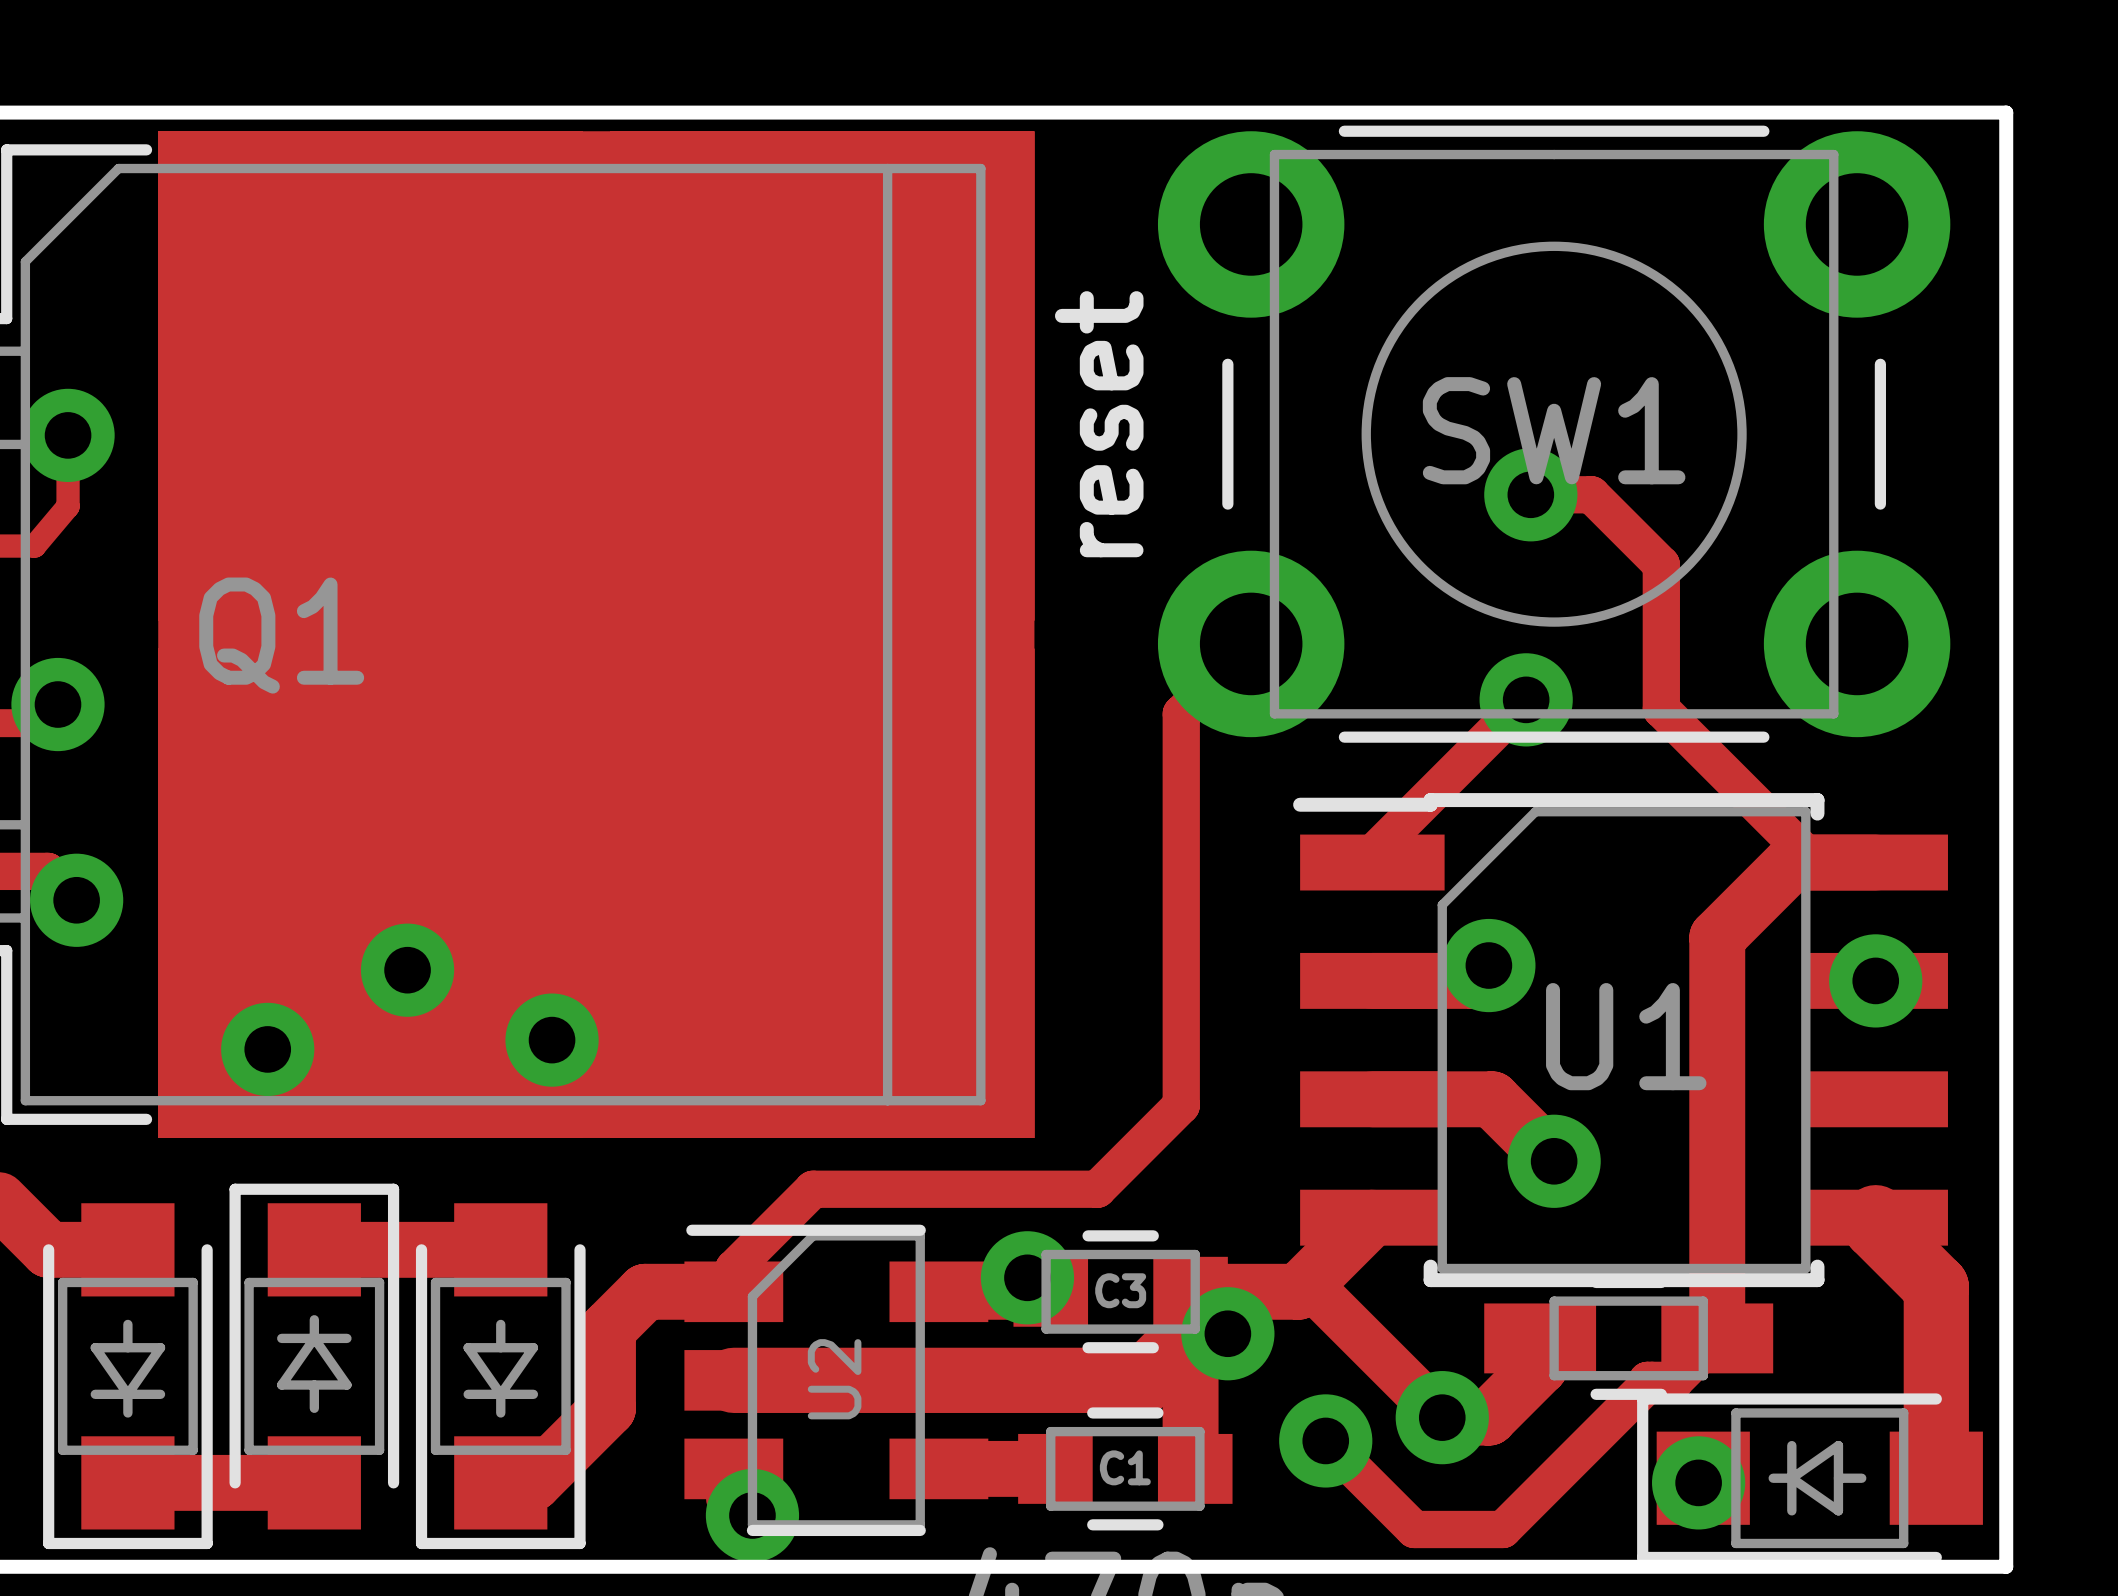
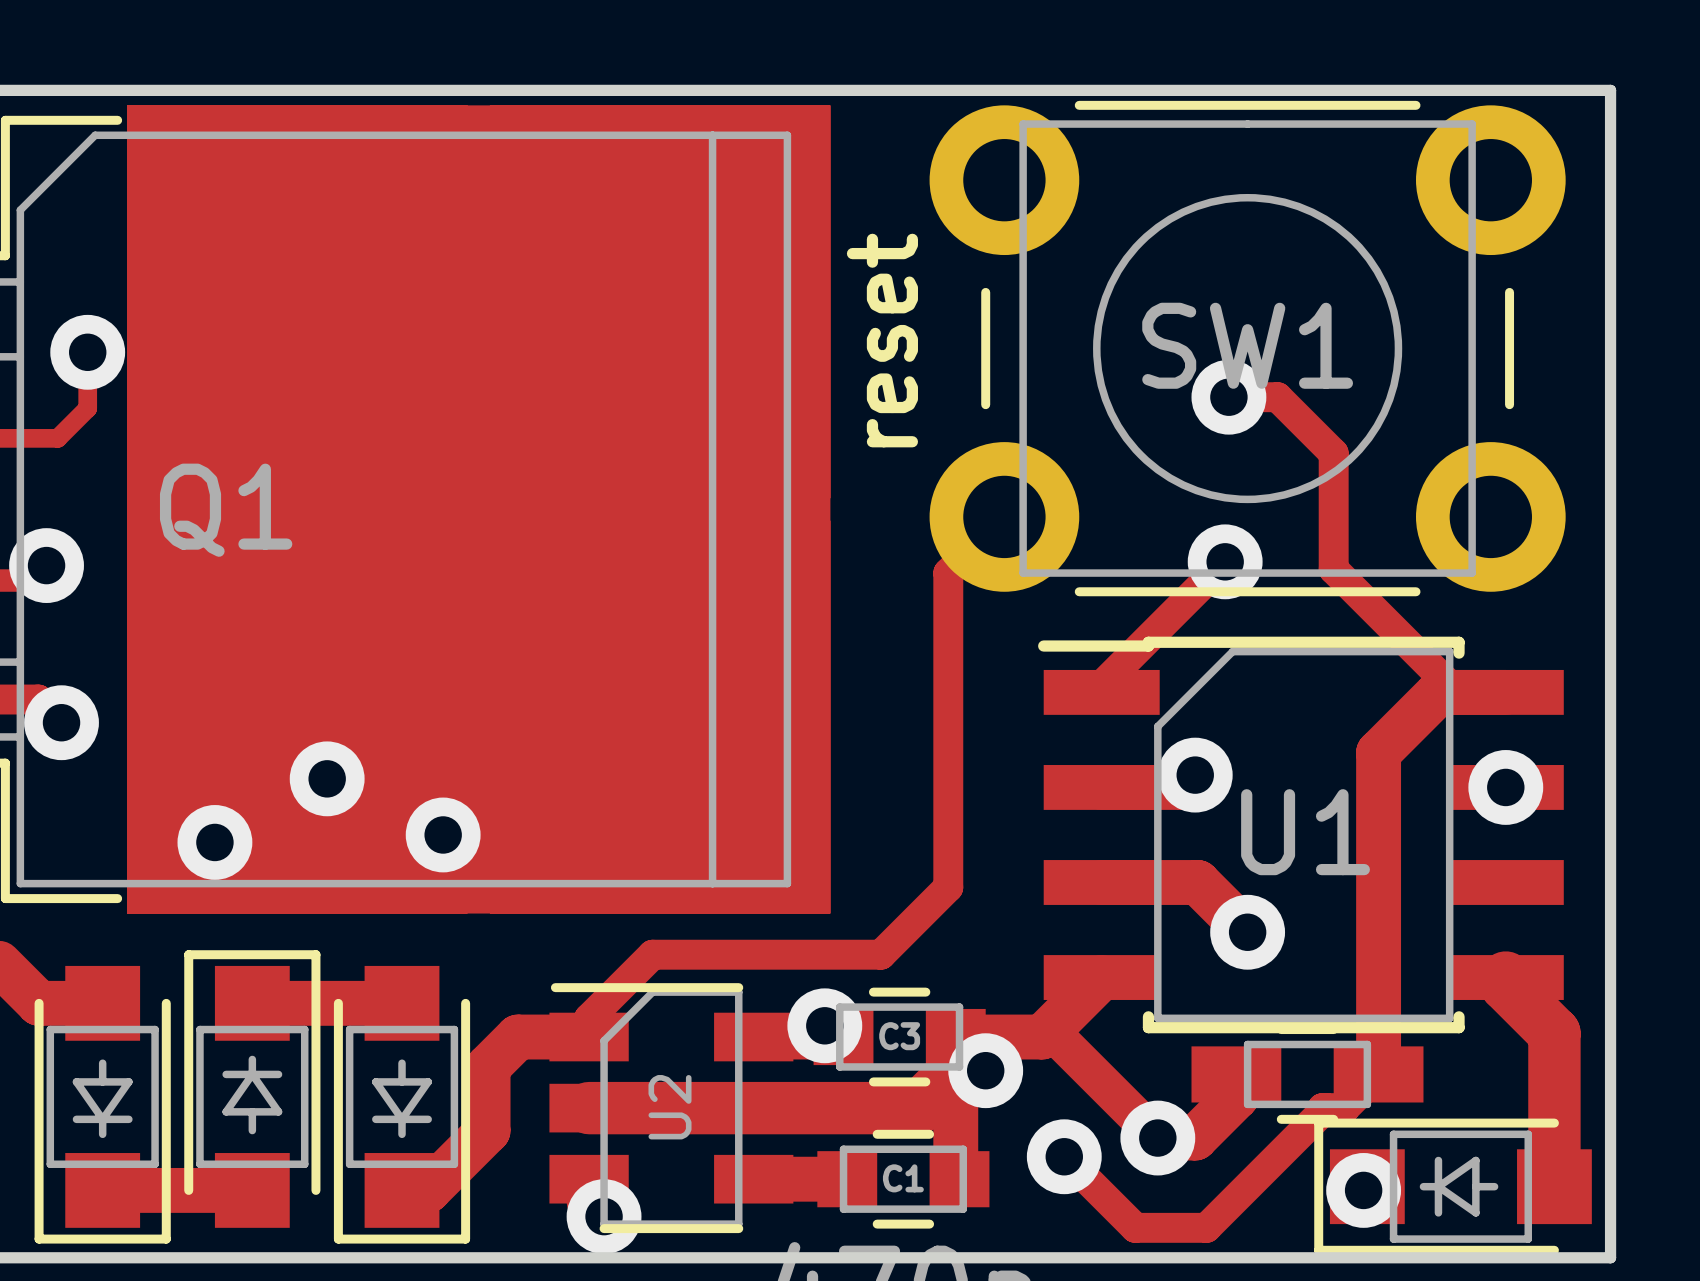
track: (68, 435) (68, 506) (34, 546) -> (87, 352) (87, 408) (57, 438) (27, 438)
via position: (68, 435) -> (87, 352)

